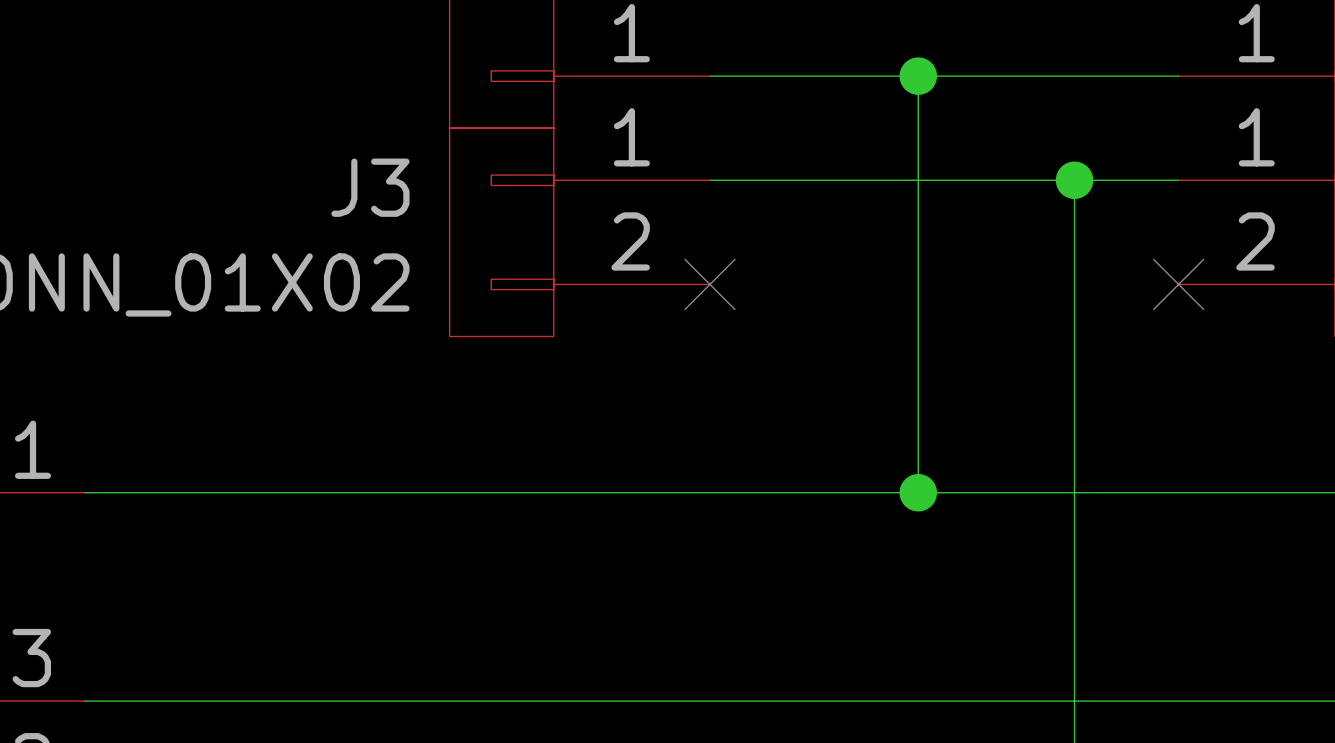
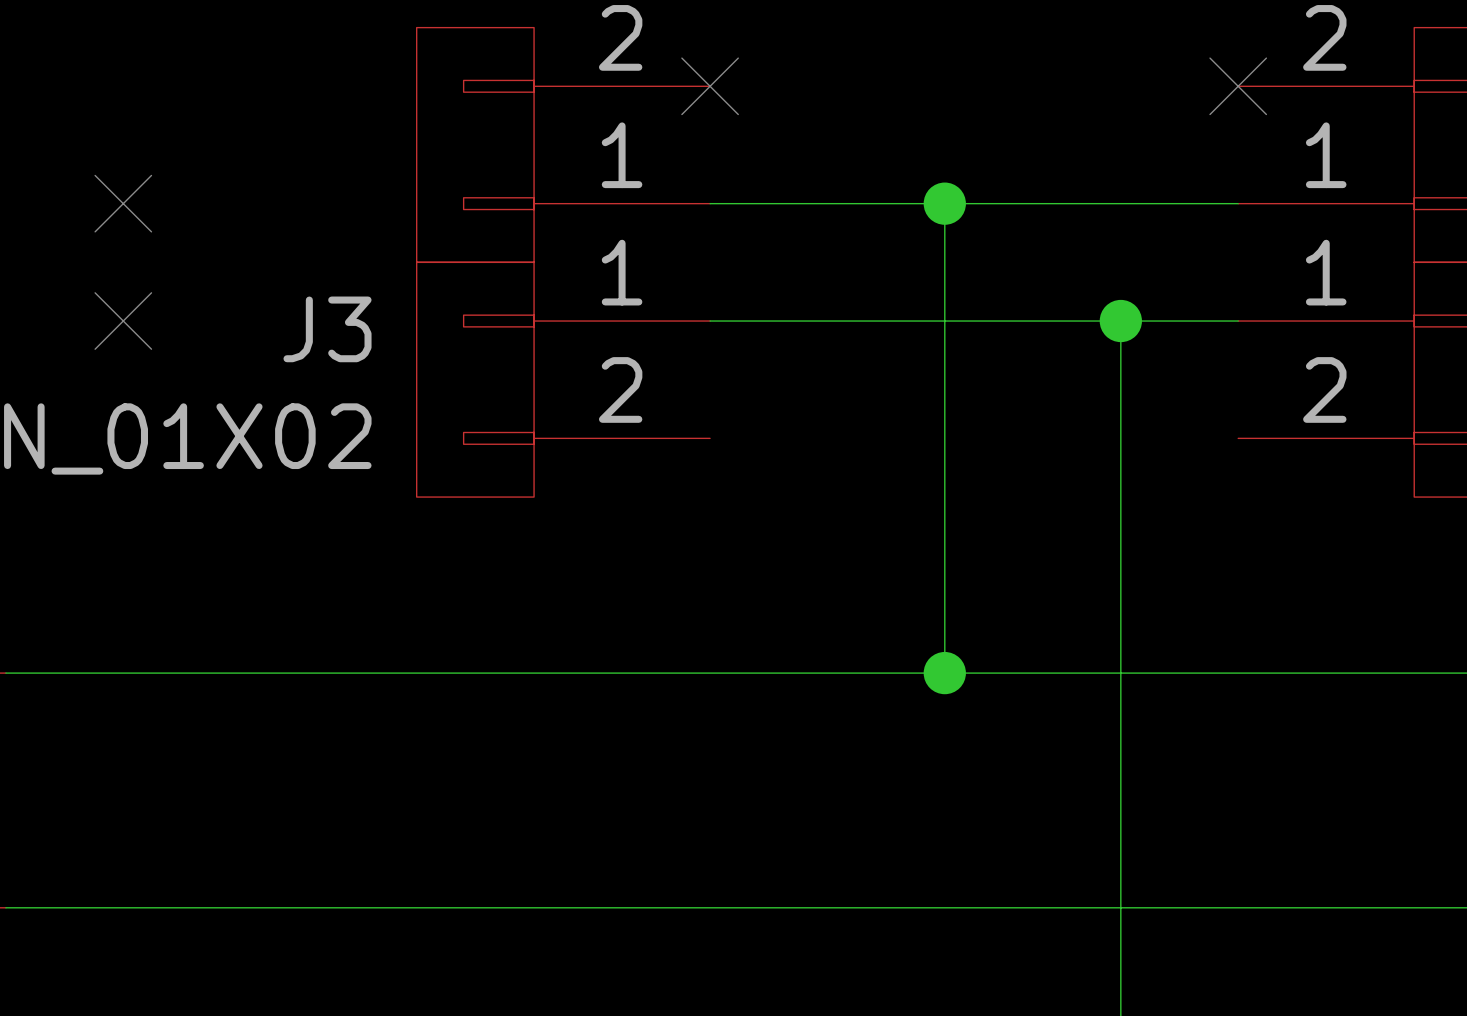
no-connect mark: none -> (123, 203)
no-connect mark: none -> (123, 321)
no-connect mark: (709, 284) -> none
no-connect mark: (1178, 284) -> none

